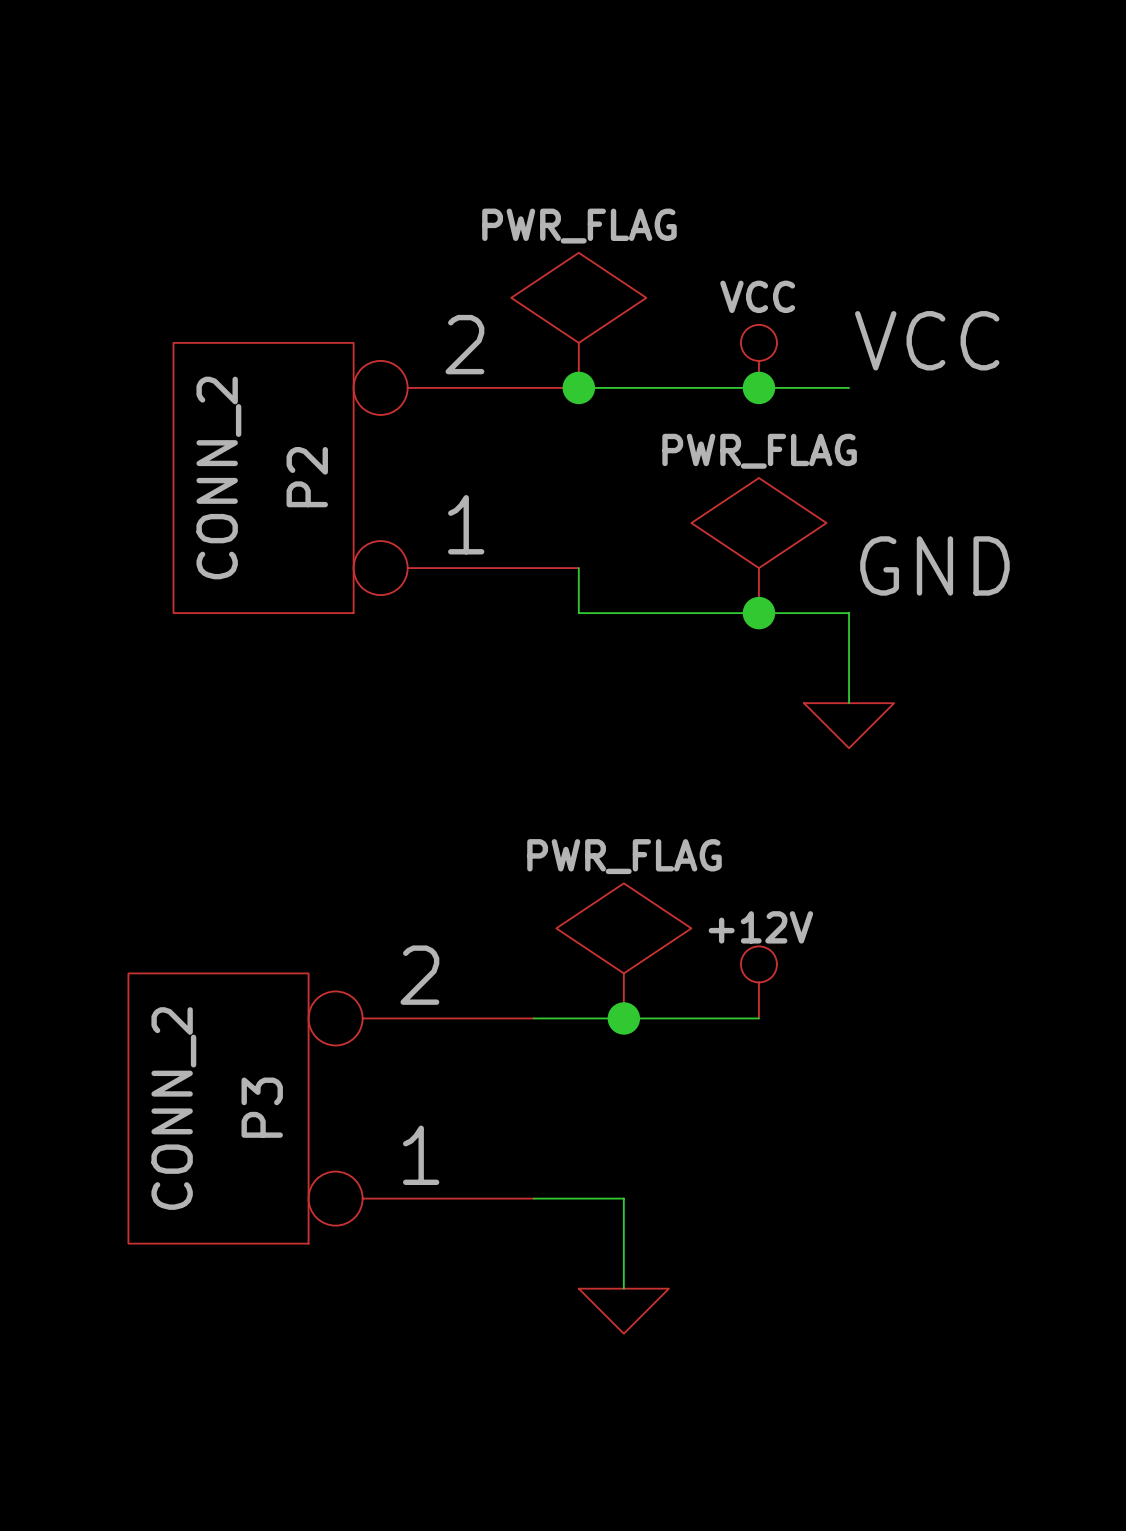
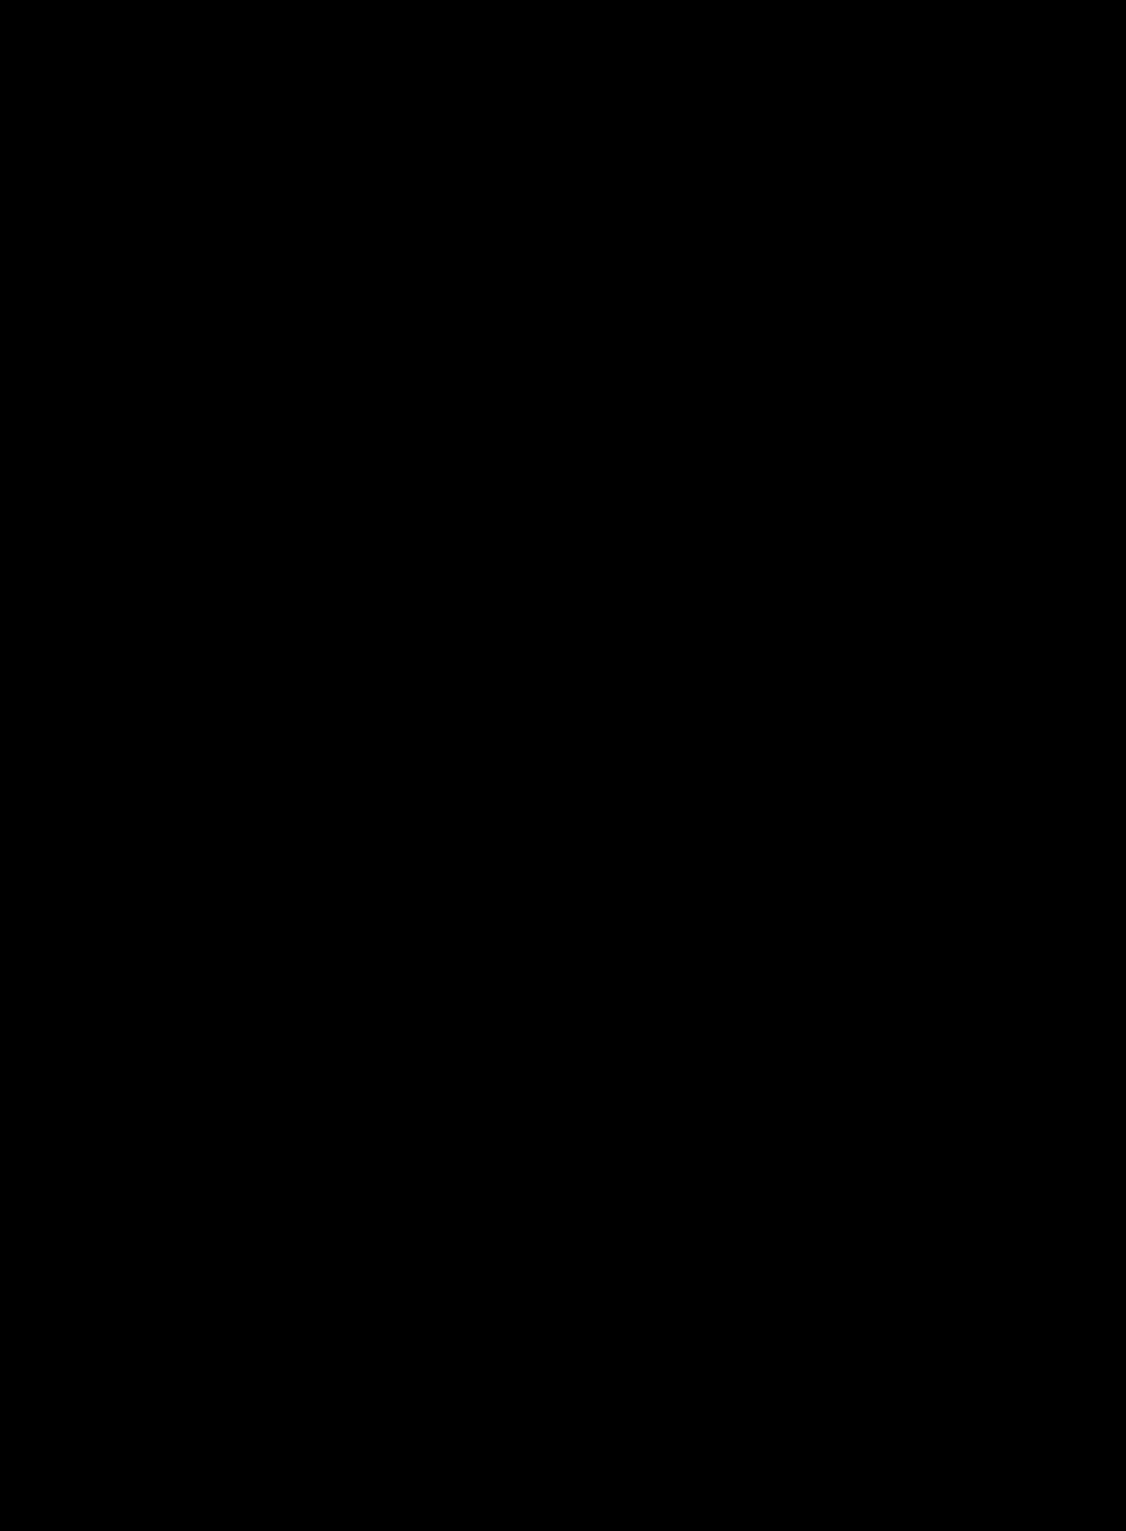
power symbol: PWR_FLAG (578, 320) -> none
label: VCC (927, 340) -> none
power symbol: VCC (758, 356) -> none
wire: (578, 387) (849, 387) -> none
junction: (578, 387) -> none
junction: (758, 387) -> none
P2: CONN_2 (376, 478) -> none
power symbol: PWR_FLAG (758, 545) -> none
label: GND (934, 565) -> none
wire: (578, 568) (578, 613) (849, 613) (849, 703) -> none
junction: (758, 613) -> none
power symbol: (849, 725) -> none
power symbol: PWR_FLAG (623, 950) -> none
power symbol: +12V (758, 982) -> none
wire: (533, 1018) (758, 1018) -> none
junction: (623, 1018) -> none
P3: CONN_2 (331, 1108) -> none
wire: (533, 1198) (623, 1198) (623, 1288) -> none
power symbol: (623, 1311) -> none

